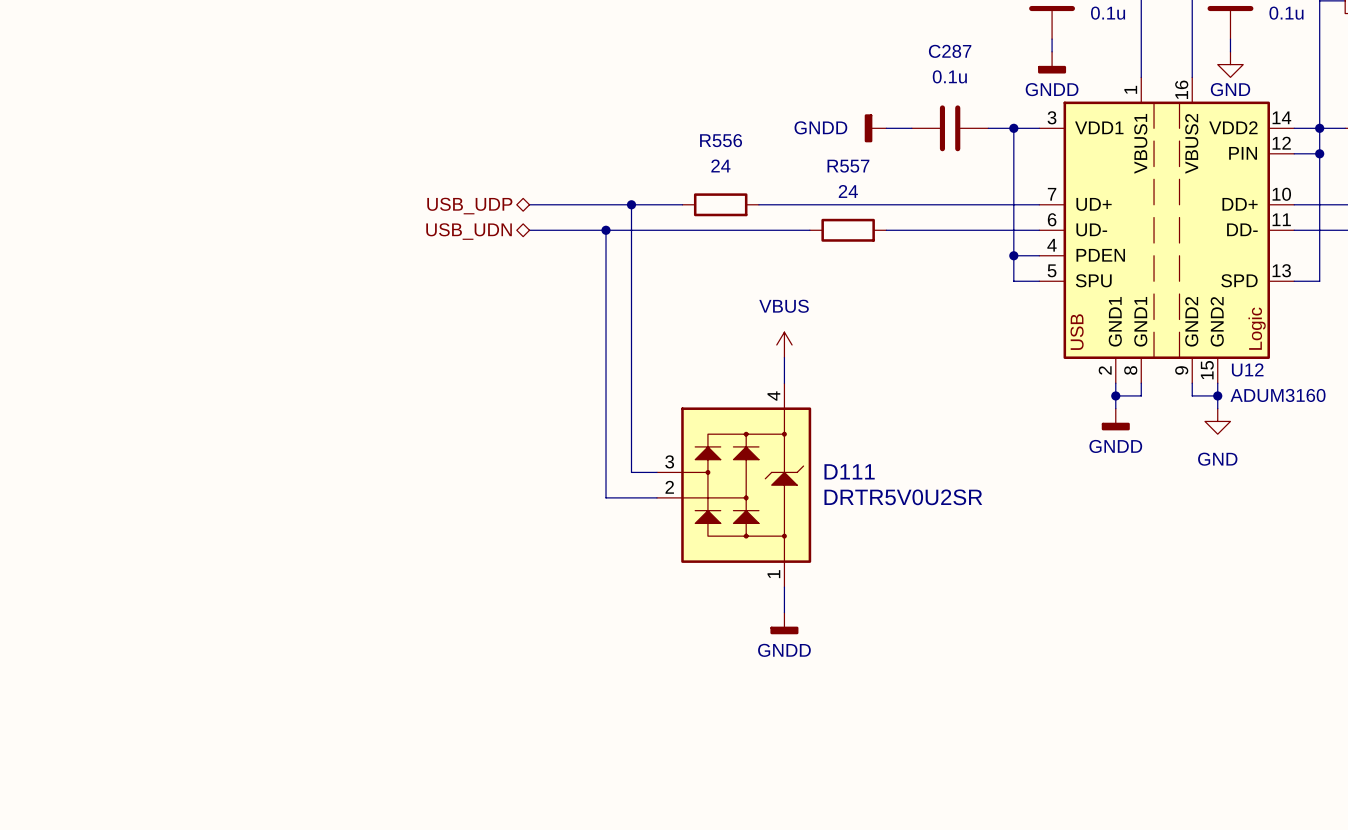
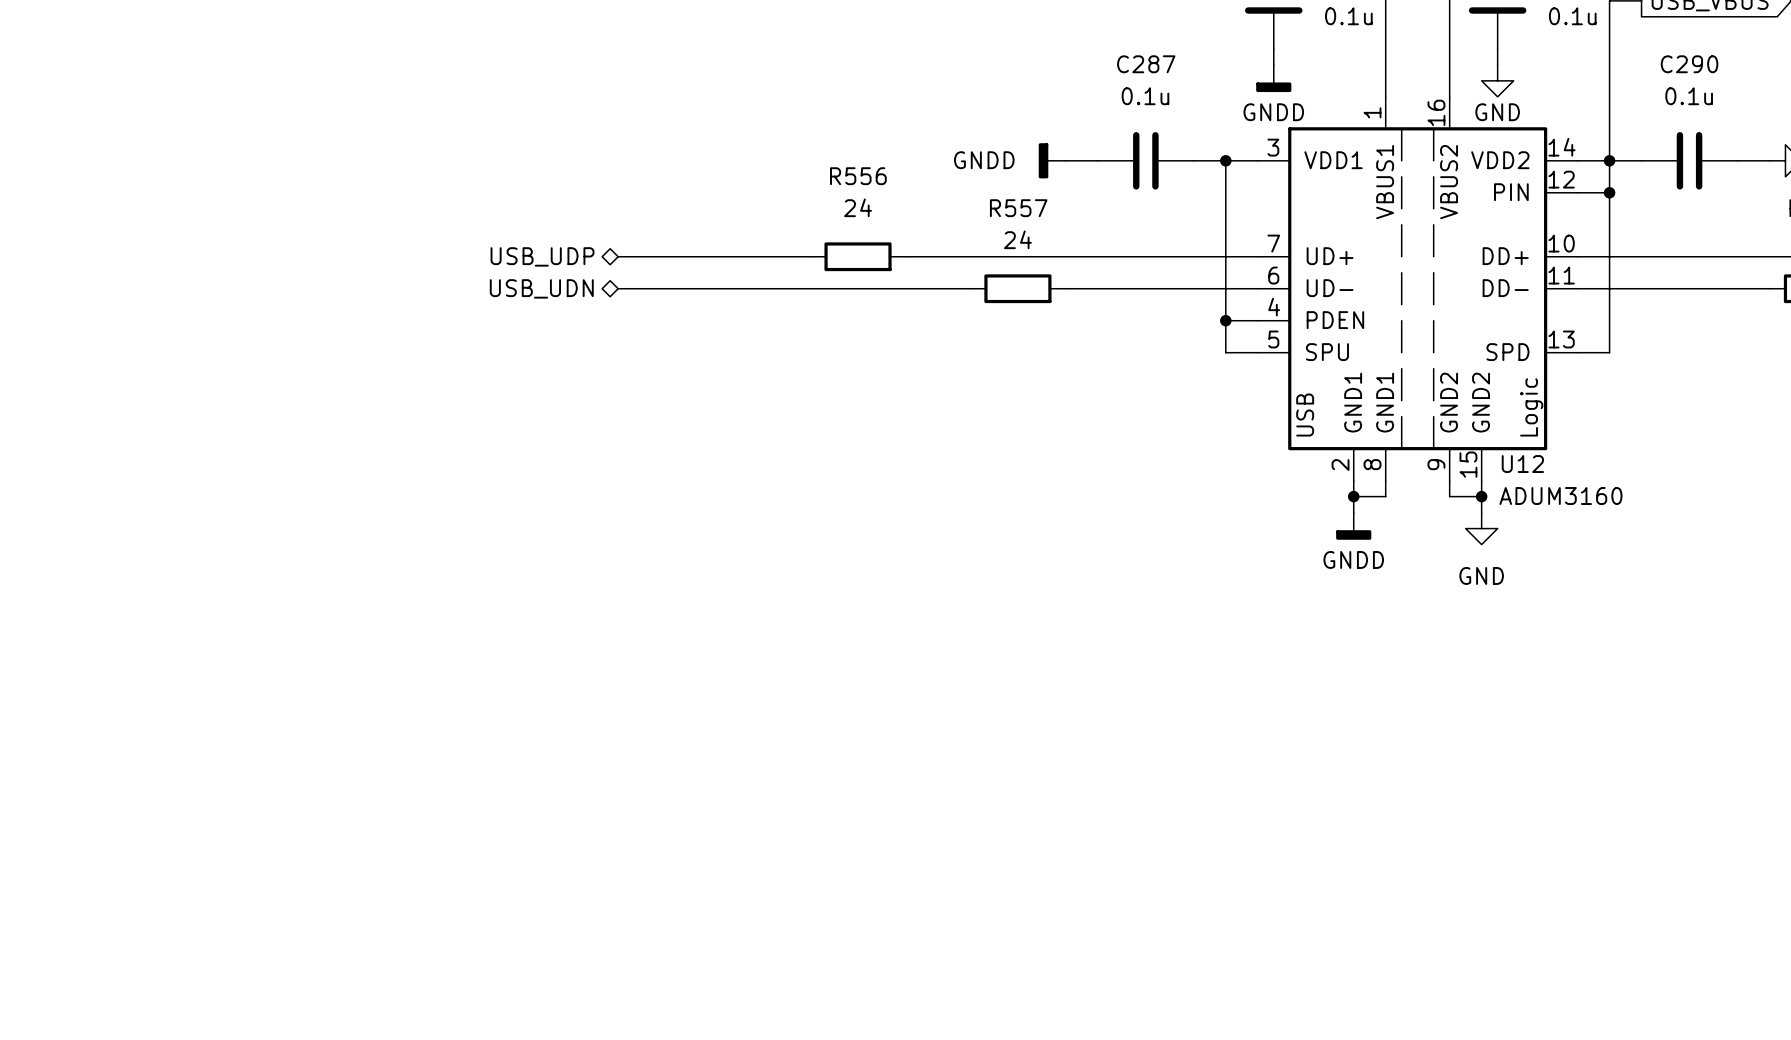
wire: (631, 204) (631, 472) (656, 472) -> none
junction: (631, 204) -> none
wire: (606, 230) (606, 497) (656, 497) -> none
junction: (606, 230) -> none
power symbol: VBUS (784, 344) -> none
wire: (784, 357) (784, 383) -> none
D111: DRTR5V0U2SR (734, 485) -> none
wire: (784, 587) (784, 612) -> none
power symbol: GNDD (784, 623) -> none

